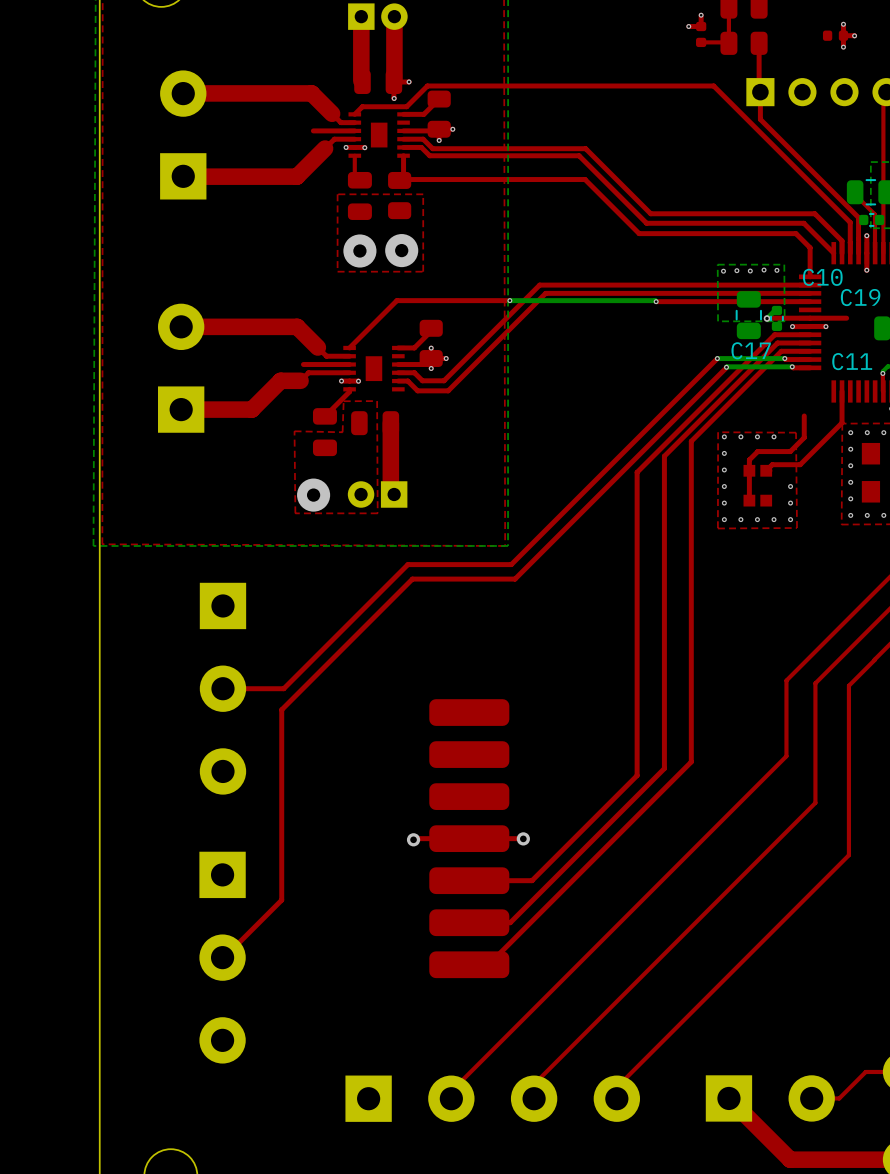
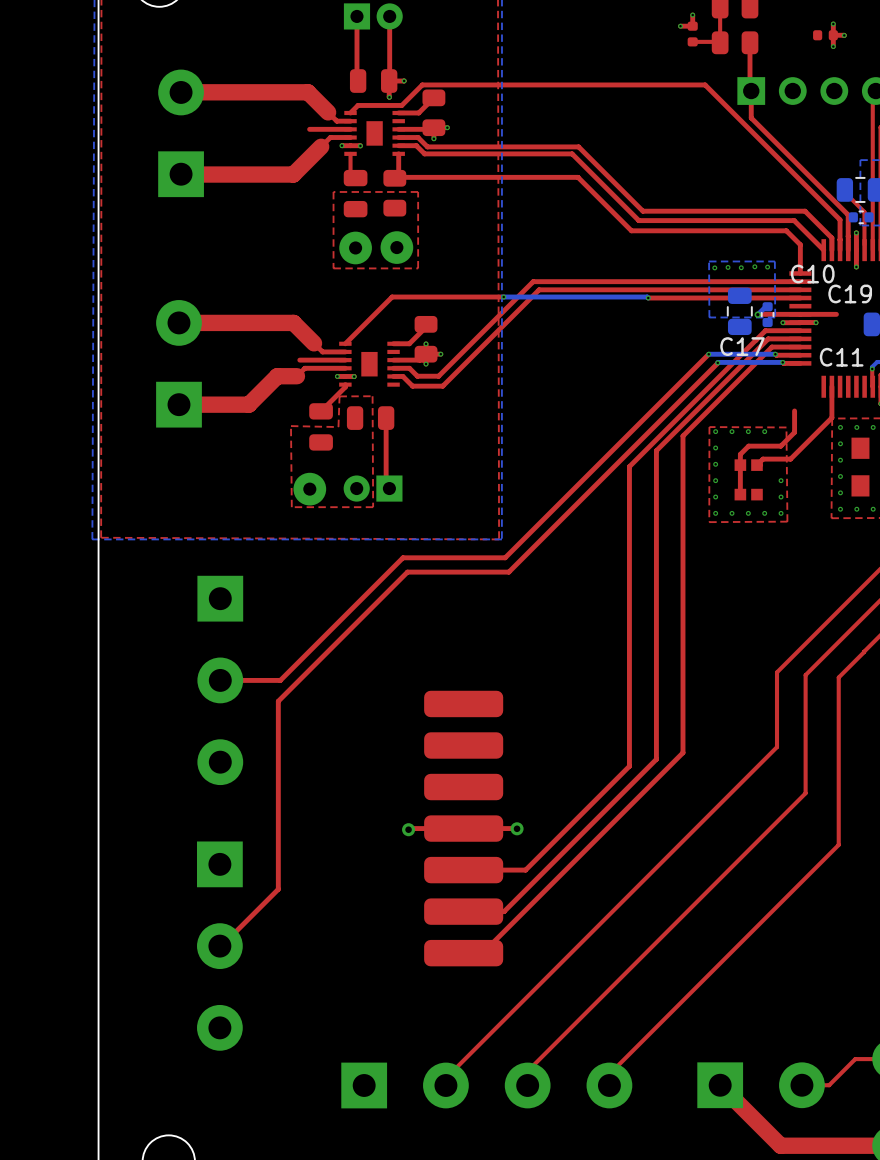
top track width: thick (361, 16) (361, 80) -> thin (356, 16) (356, 79)
top track width: thick (394, 16) (394, 81) -> thin (389, 16) (389, 80)
top track width: thick (390, 423) (390, 491) -> thin (386, 418) (386, 485)

